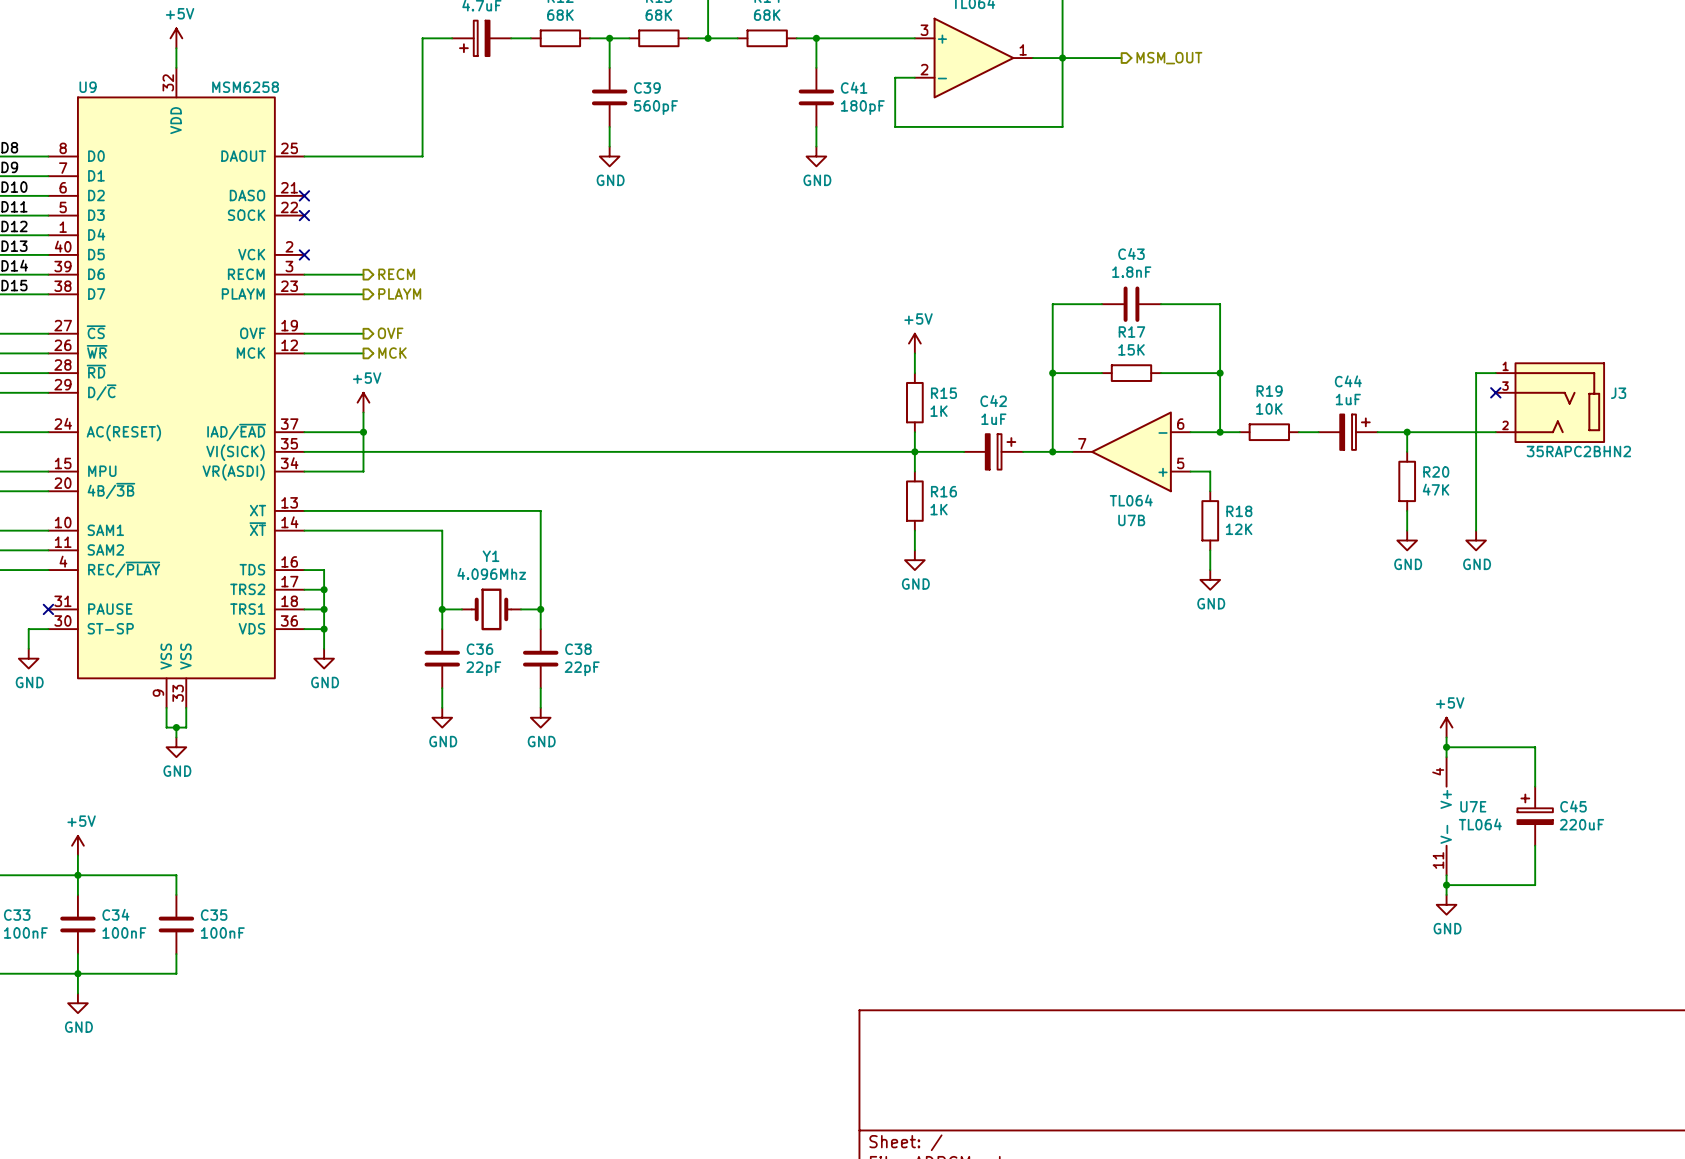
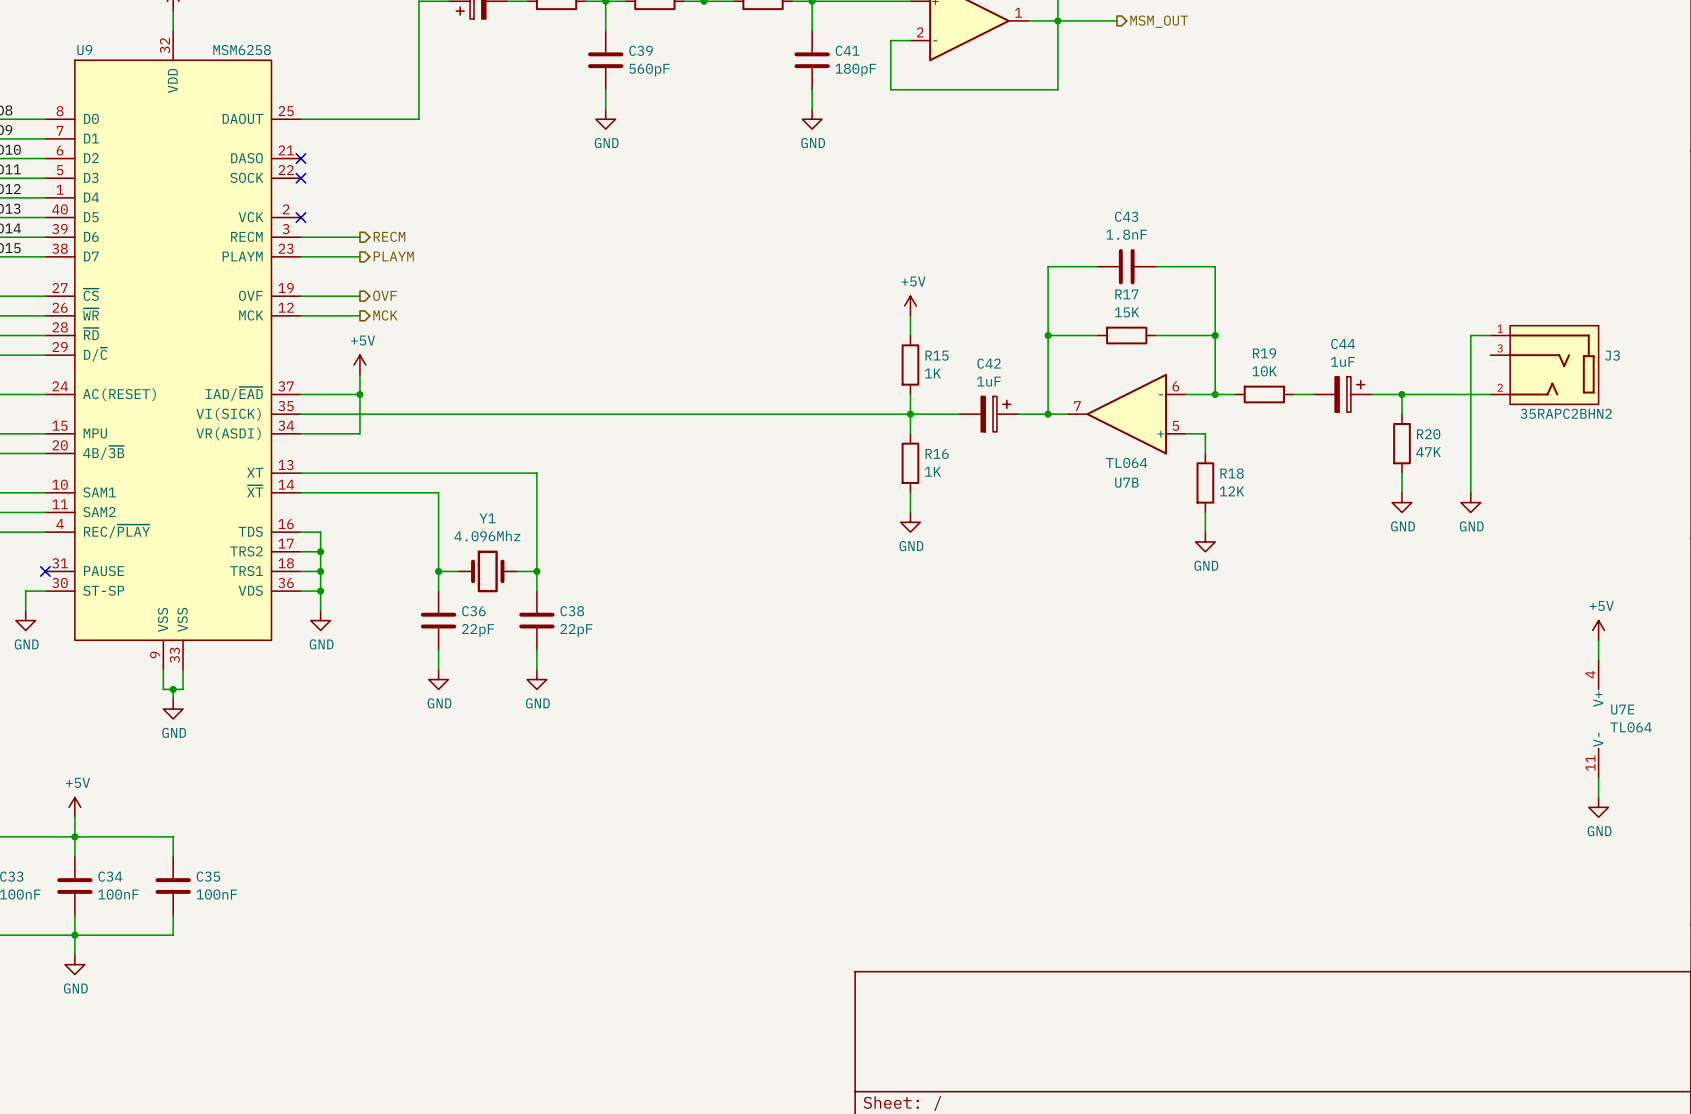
no-connect mark: (1495, 392) -> none
power symbol position: +5V (1446, 727) -> +5V (1598, 630)
wire: (1446, 737) (1446, 757) -> (1598, 640) (1598, 659)
wire: (1446, 747) (1535, 747) (1535, 786) -> none
junction: (1446, 747) -> none
U7E position: (1446, 816) -> (1598, 718)
C45: 220uF (1535, 816) -> none
wire: (1535, 845) (1535, 885) (1446, 885) -> none
wire: (1446, 875) (1446, 894) -> (1598, 777) (1598, 797)
junction: (1446, 885) -> none
power symbol position: GND (1446, 904) -> GND (1598, 807)

